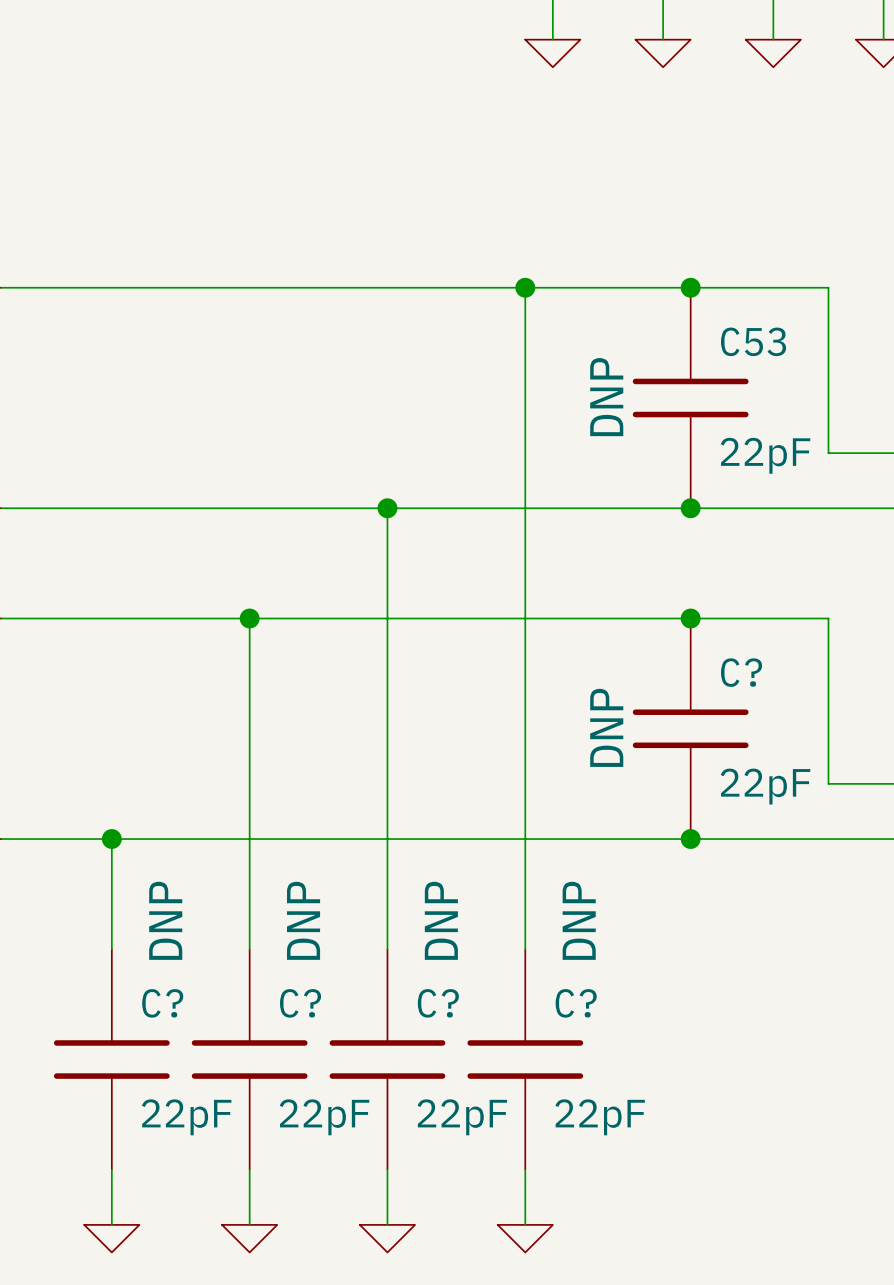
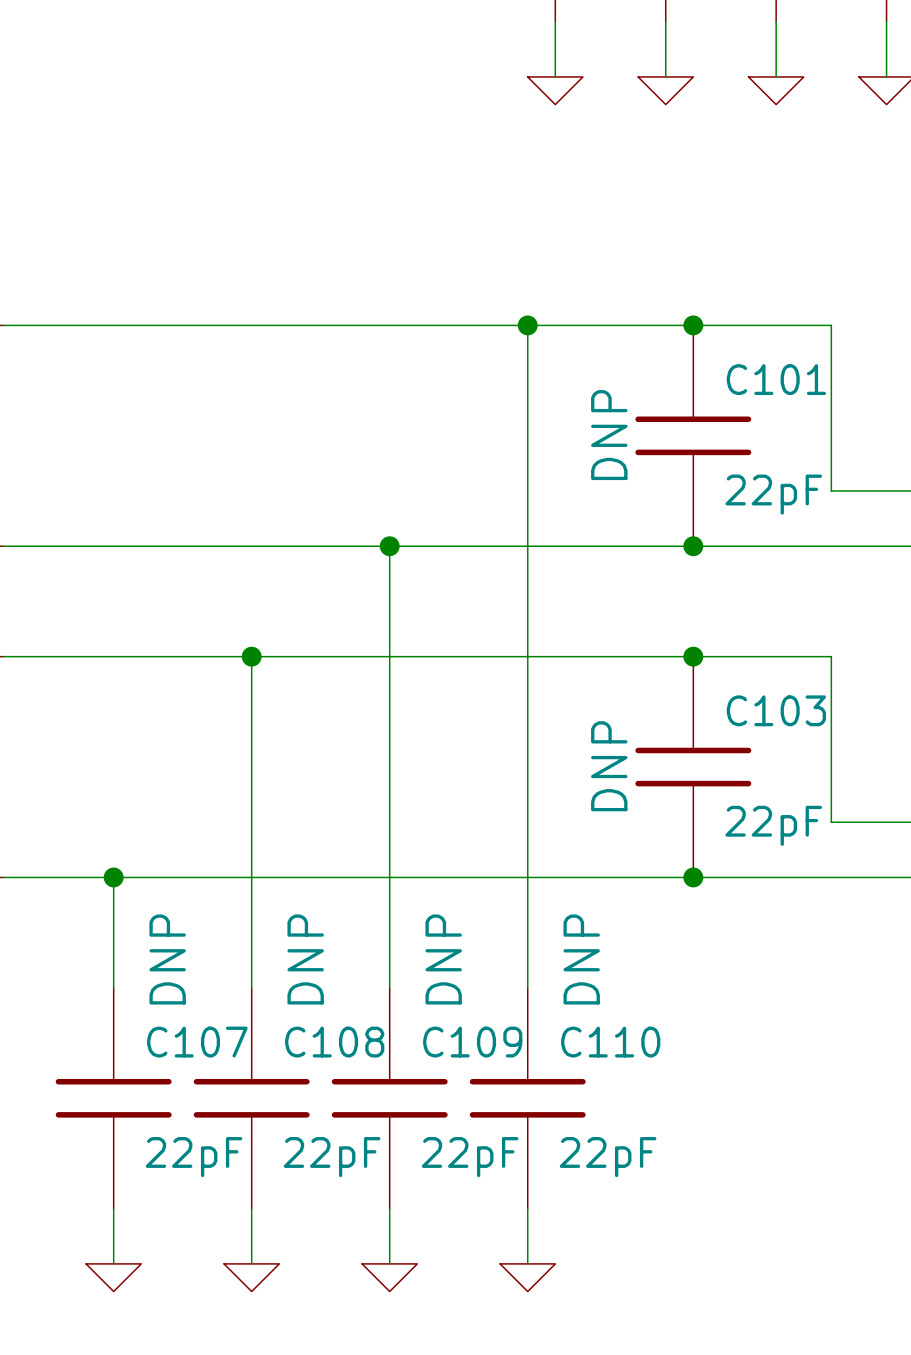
C53 name: C53 (753, 341) -> C101 (776, 379)
C? name: C? (741, 672) -> C103 (776, 710)
C? name: C? (162, 1003) -> C107 (197, 1042)
C? name: C? (300, 1003) -> C108 (334, 1042)
C? name: C? (438, 1003) -> C109 (472, 1042)
C? name: C? (576, 1003) -> C110 (610, 1042)

